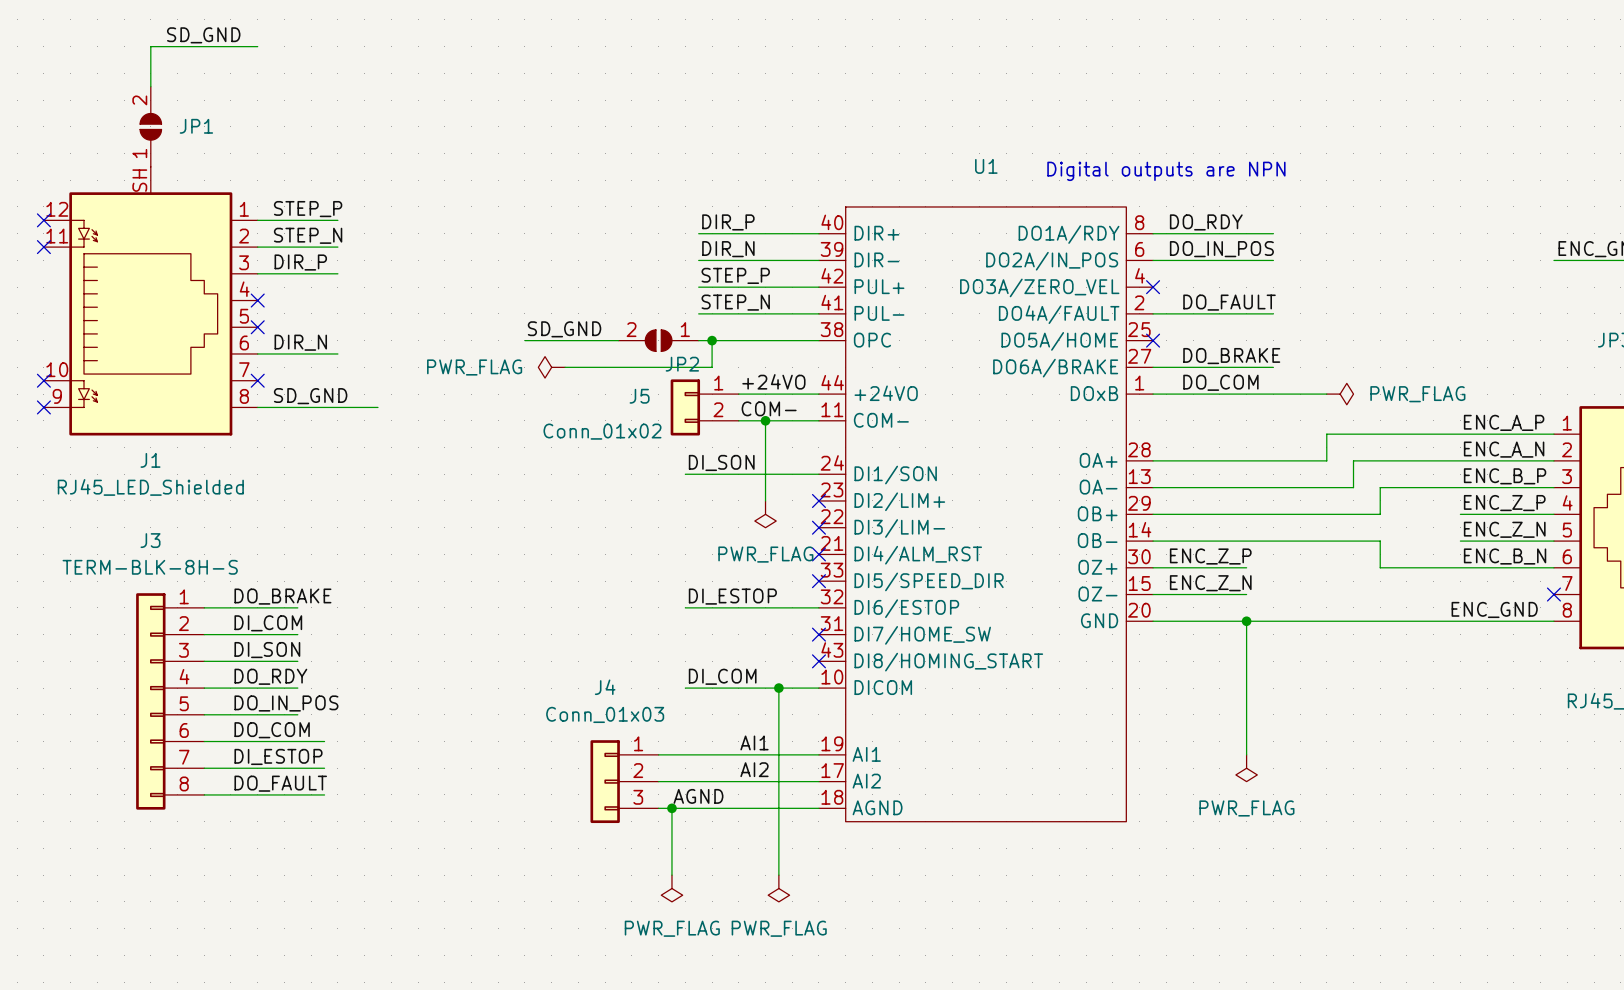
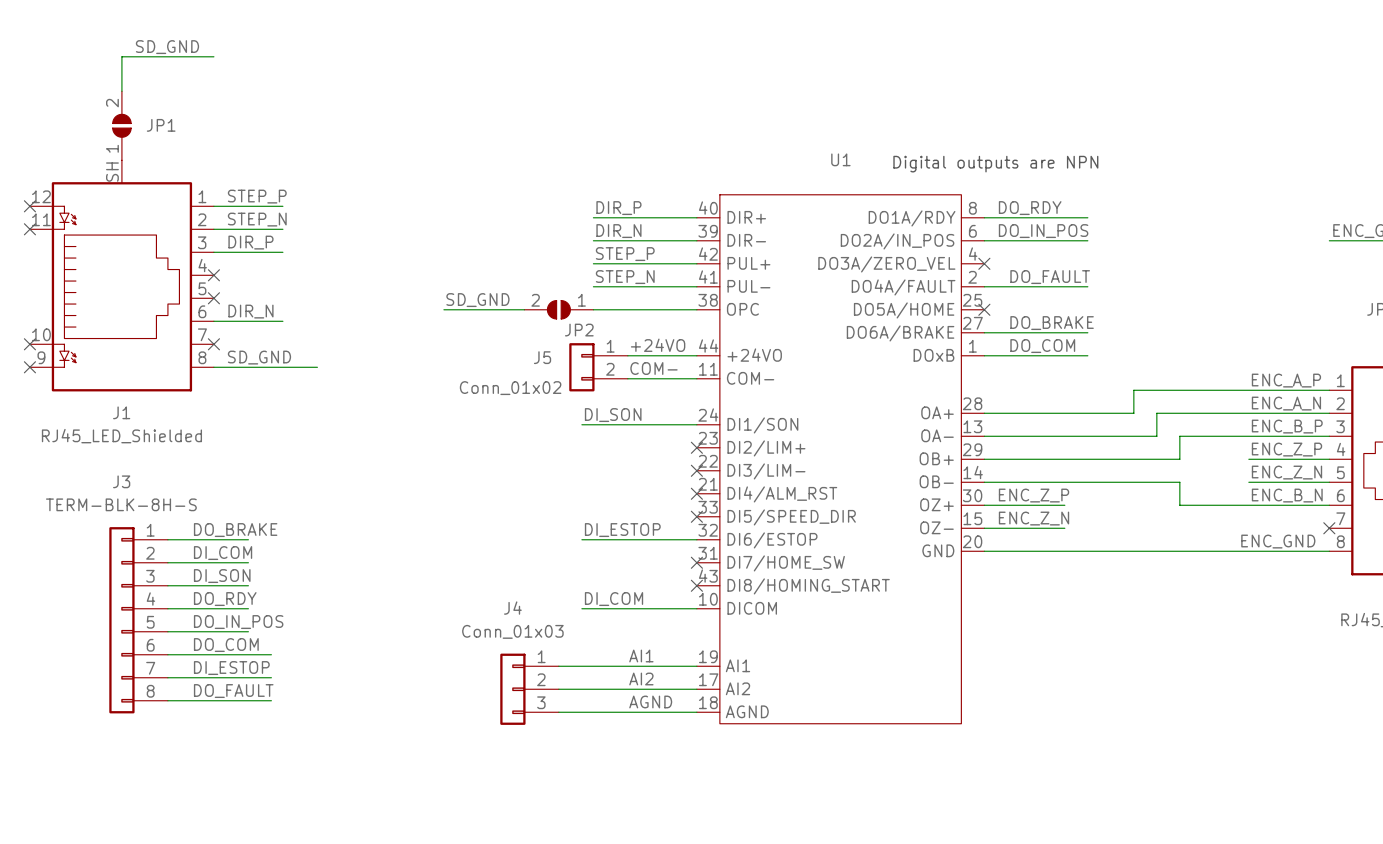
wire: (712, 340) (712, 367) (565, 367) -> none
junction: (712, 340) -> none
power symbol: PWR_FLAG (551, 367) -> none
wire: (1273, 394) (1326, 394) -> none
power symbol: PWR_FLAG (1340, 394) -> none
wire: (765, 420) (765, 500) -> none
junction: (765, 420) -> none
power symbol: PWR_FLAG (765, 514) -> none
wire: (1246, 621) (1246, 754) -> none
junction: (1246, 621) -> none
wire: (778, 688) (778, 875) -> none
junction: (778, 688) -> none
power symbol: PWR_FLAG (1246, 768) -> none
label position: AGND (698, 796) -> AGND (650, 701)
wire: (671, 808) (671, 875) -> none
junction: (671, 808) -> none
power symbol: PWR_FLAG (671, 888) -> none
power symbol: PWR_FLAG (778, 888) -> none

